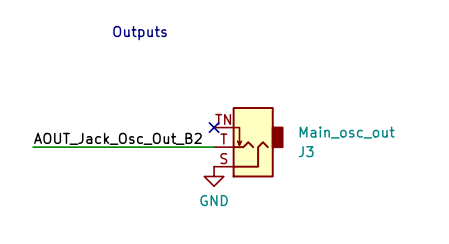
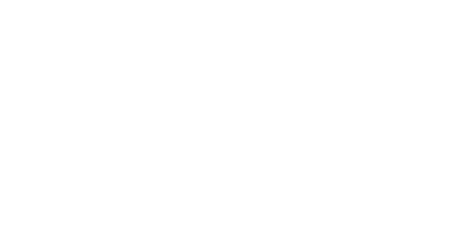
text: Outputs (140, 33) -> none
no-connect mark: (214, 127) -> none
label: AOUT_Jack_Osc_Out_B2 (117, 138) -> none
J3: Main_osc_out (248, 142) -> none
wire: (33, 147) (214, 147) -> none
power symbol: GND (214, 176) -> none

